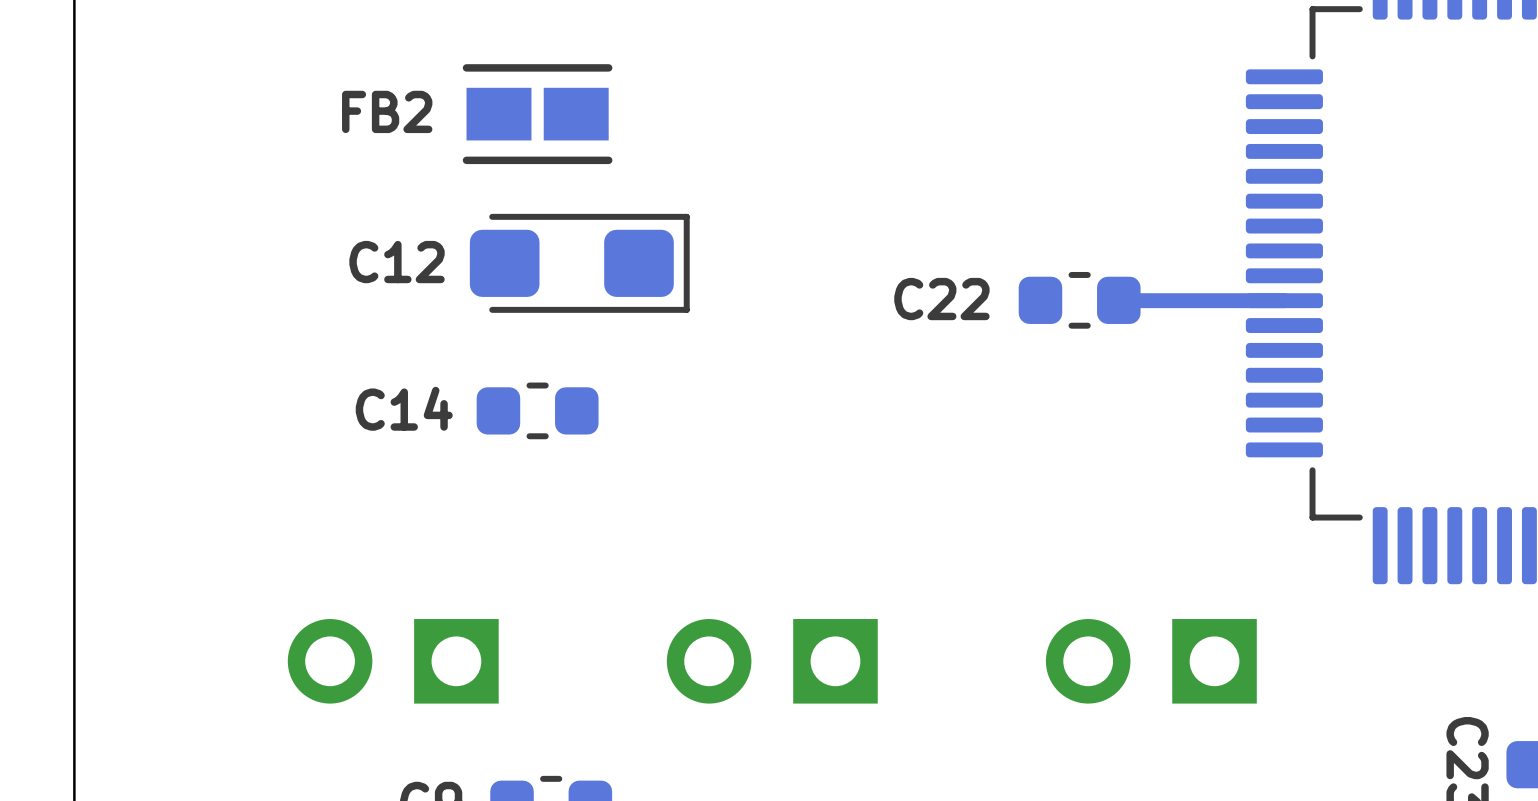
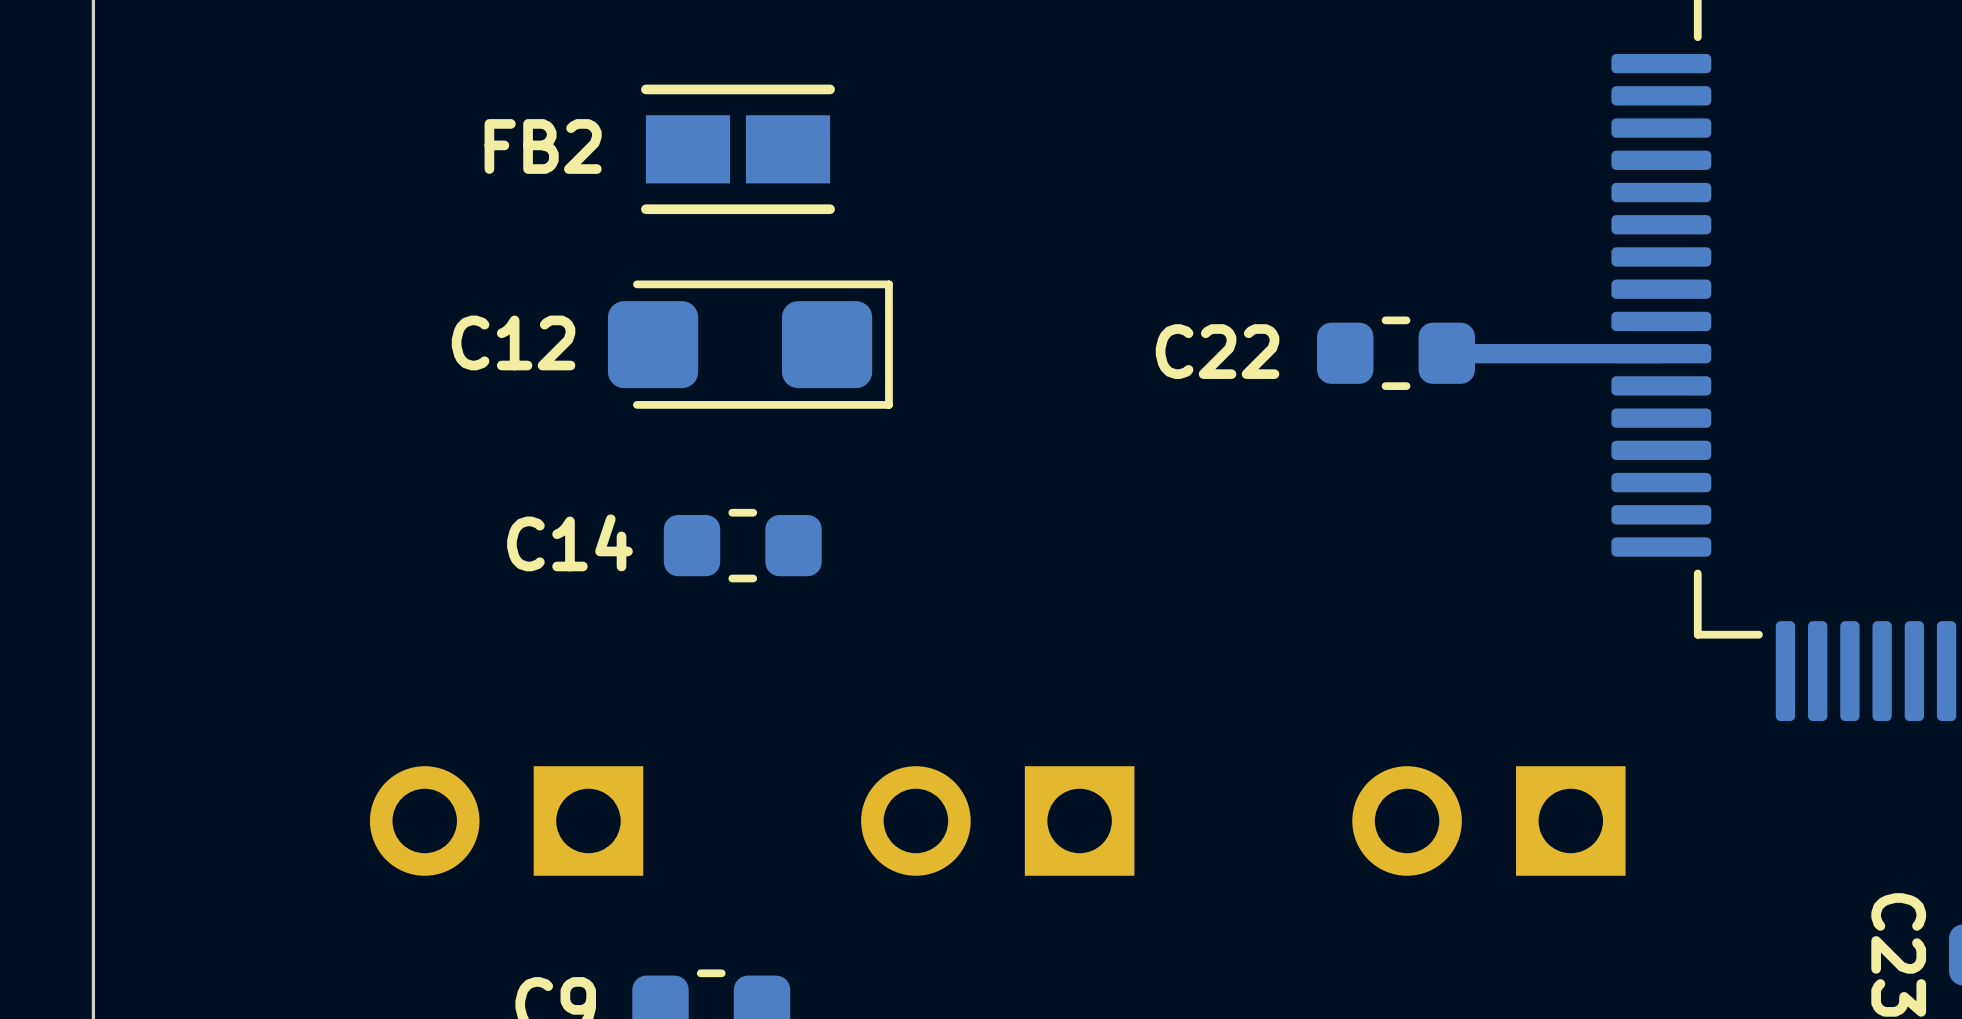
FB2 position: (537, 114) -> (738, 149)
C12 position: (579, 263) -> (750, 344)
C14 position: (537, 410) -> (742, 545)

